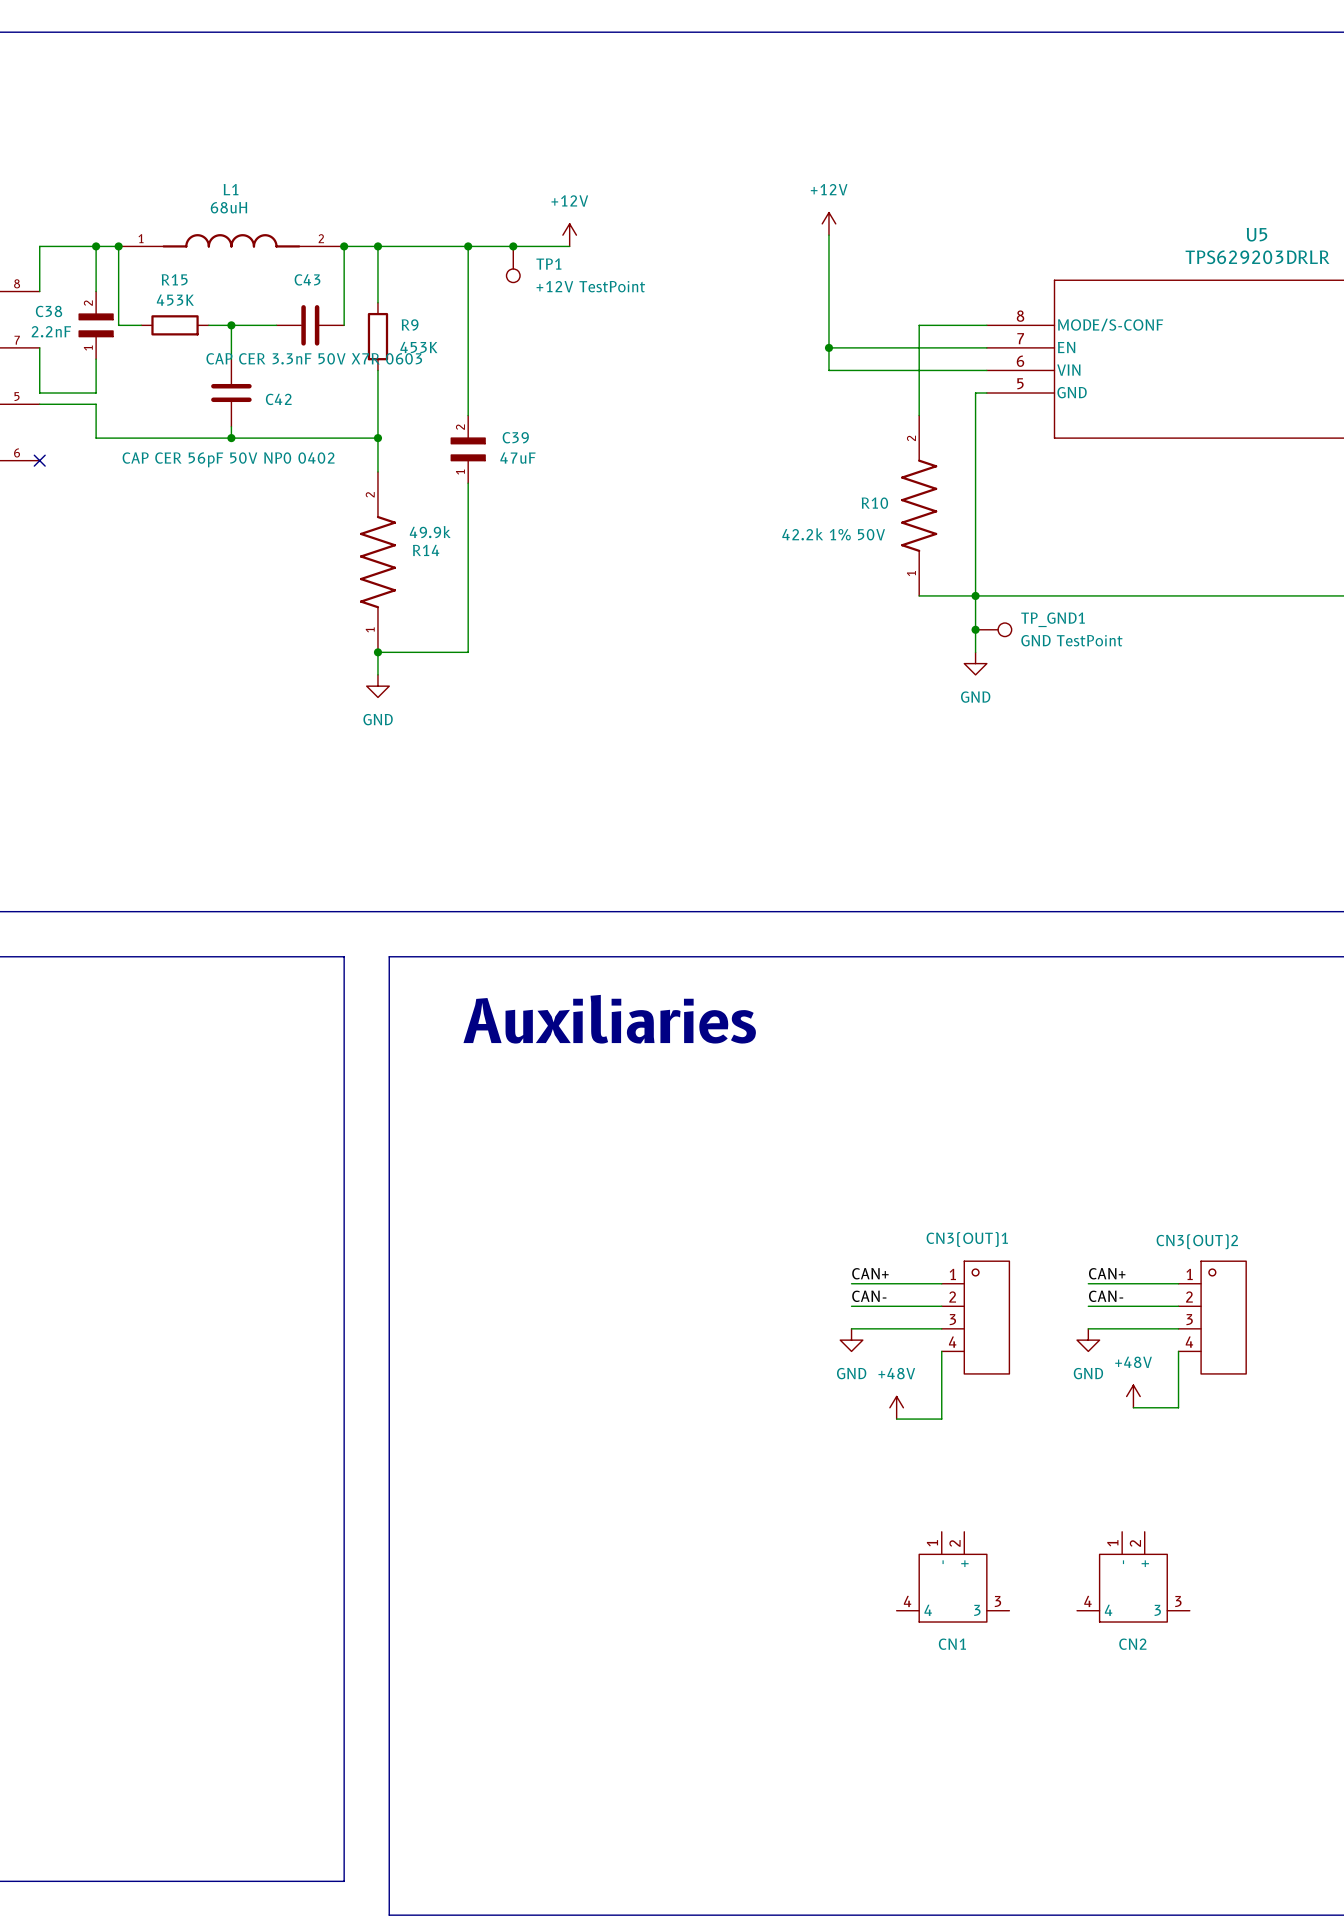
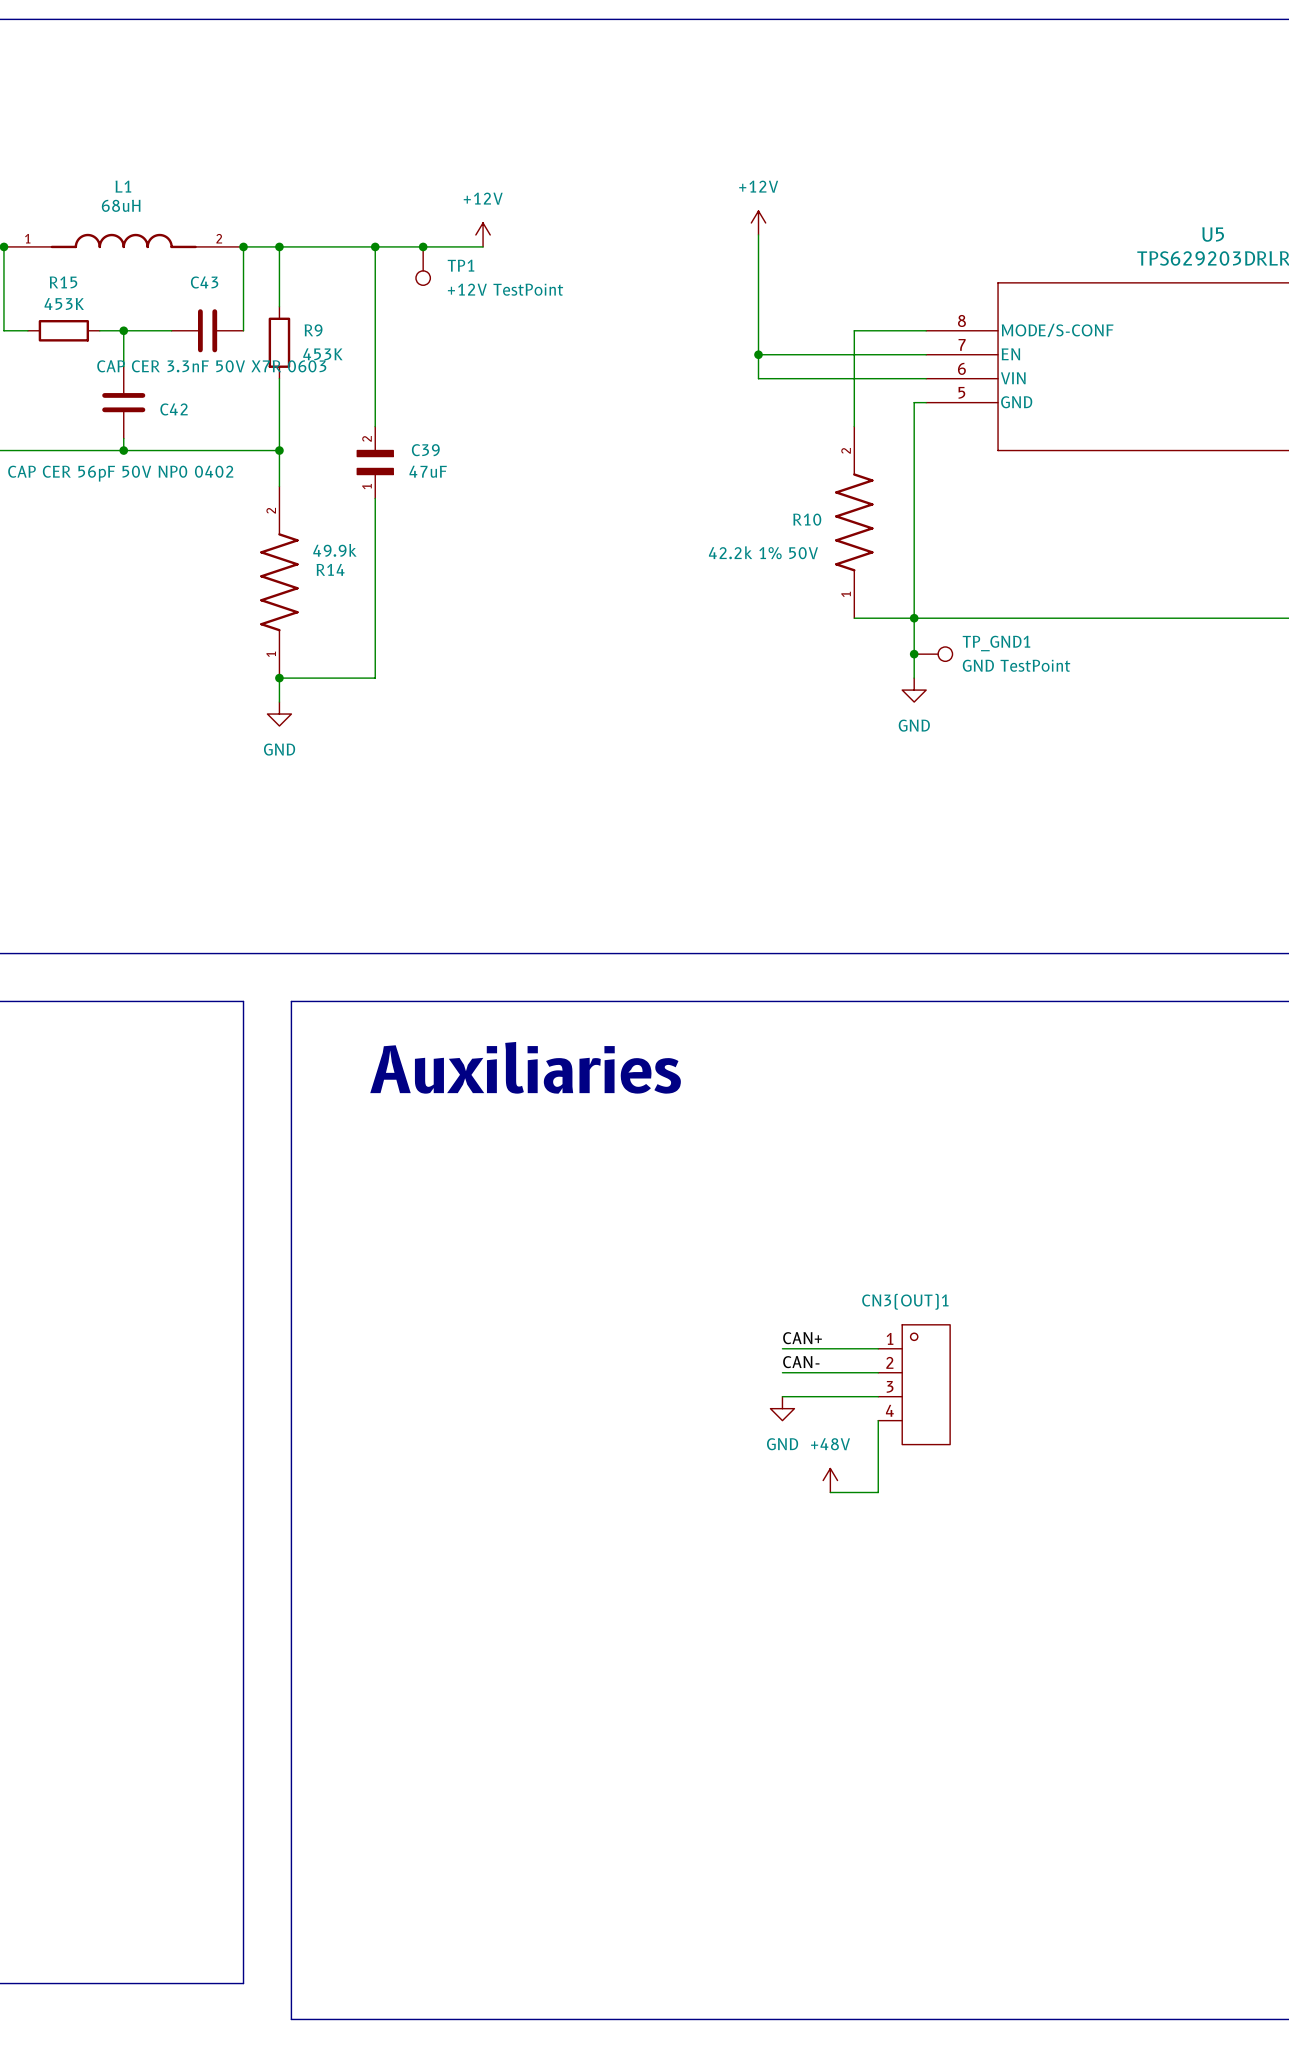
label: CAN+ (1107, 1273) -> none
wire: (1088, 1283) (1178, 1283) -> none
label: CAN- (1106, 1296) -> none
wire: (1088, 1306) (1178, 1306) -> none
CN3(OUT)2: (1212, 1317) -> none
wire: (1088, 1328) (1178, 1328) -> none
power symbol: GND (1088, 1340) -> none
wire: (1178, 1351) (1178, 1407) (1133, 1407) -> none
power symbol: +48V (1133, 1396) -> none
CN1: (953, 1576) -> none
CN2: (1133, 1576) -> none

